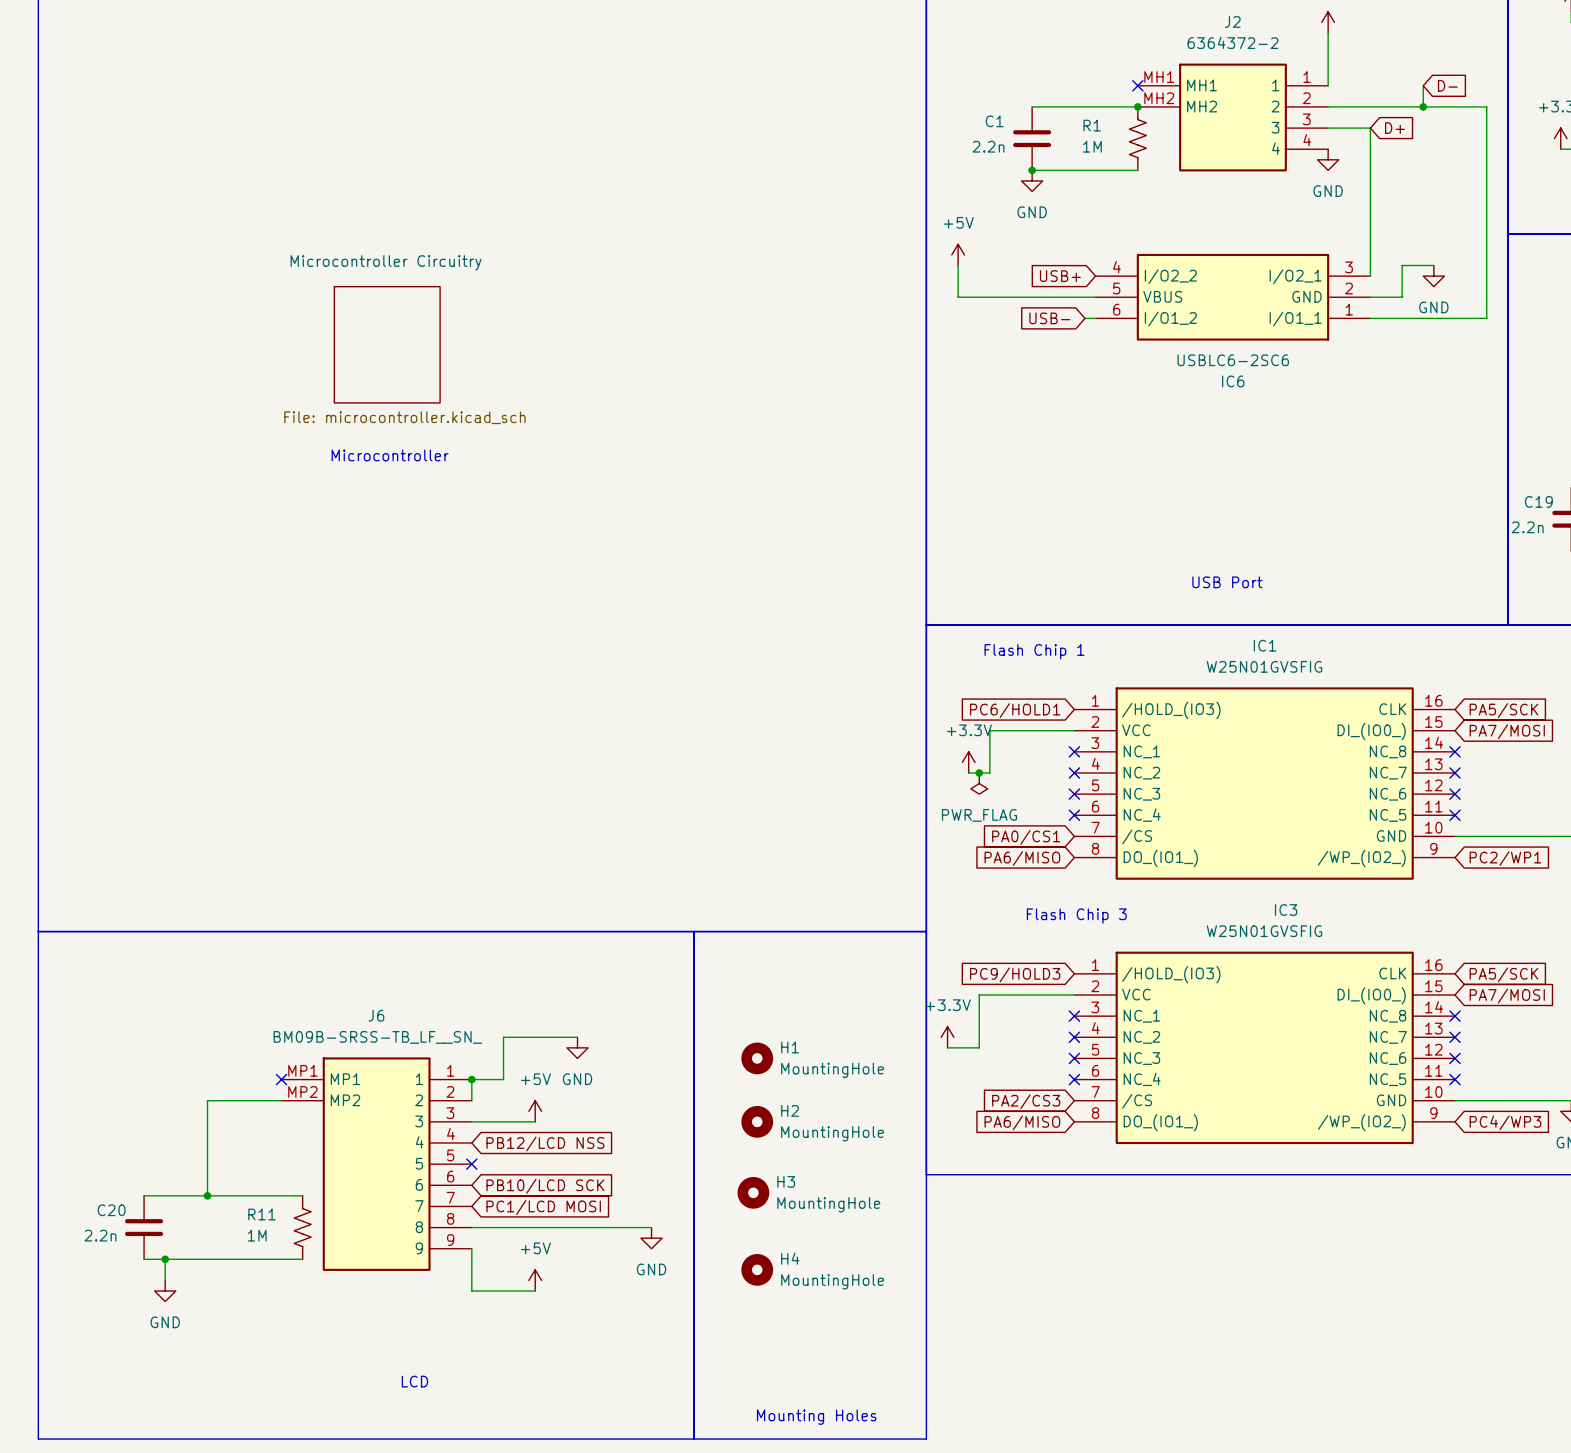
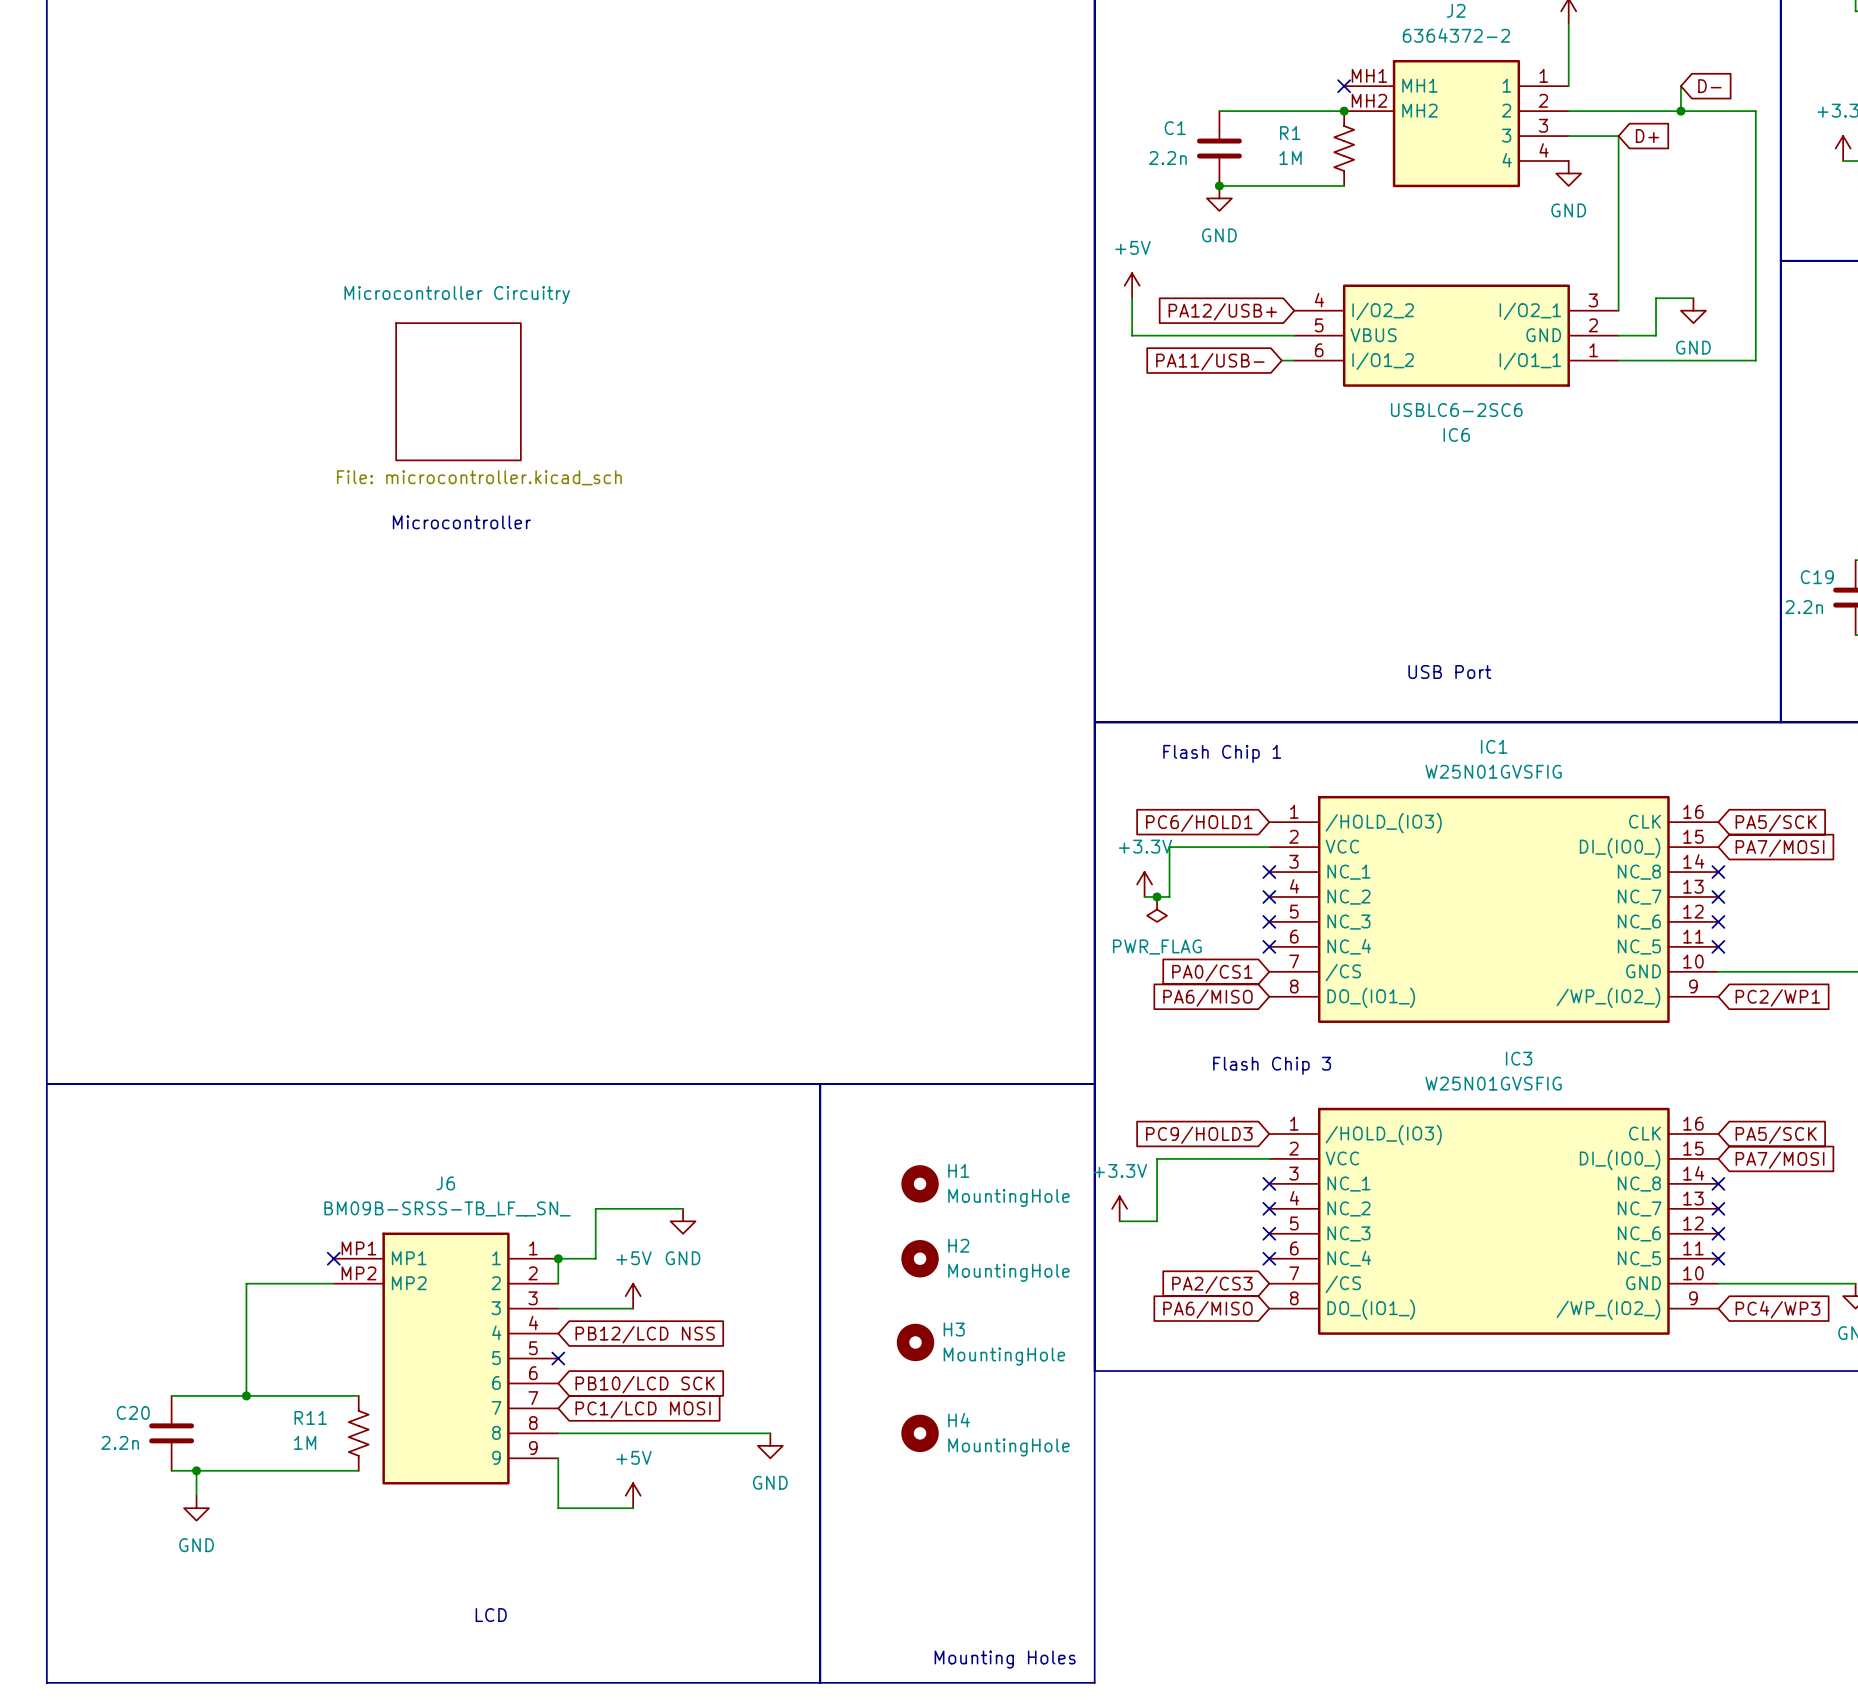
global label: USB+ (1060, 276) -> PA12/USB+ (1222, 311)
global label: USB- (1049, 318) -> PA11/USB- (1210, 361)
H1 position: (757, 1058) -> (920, 1183)
H2 position: (757, 1121) -> (920, 1258)
H3 position: (753, 1192) -> (915, 1342)
H4 position: (757, 1269) -> (920, 1433)
text position: Mounting Holes (816, 1417) -> Mounting Holes (1005, 1659)

